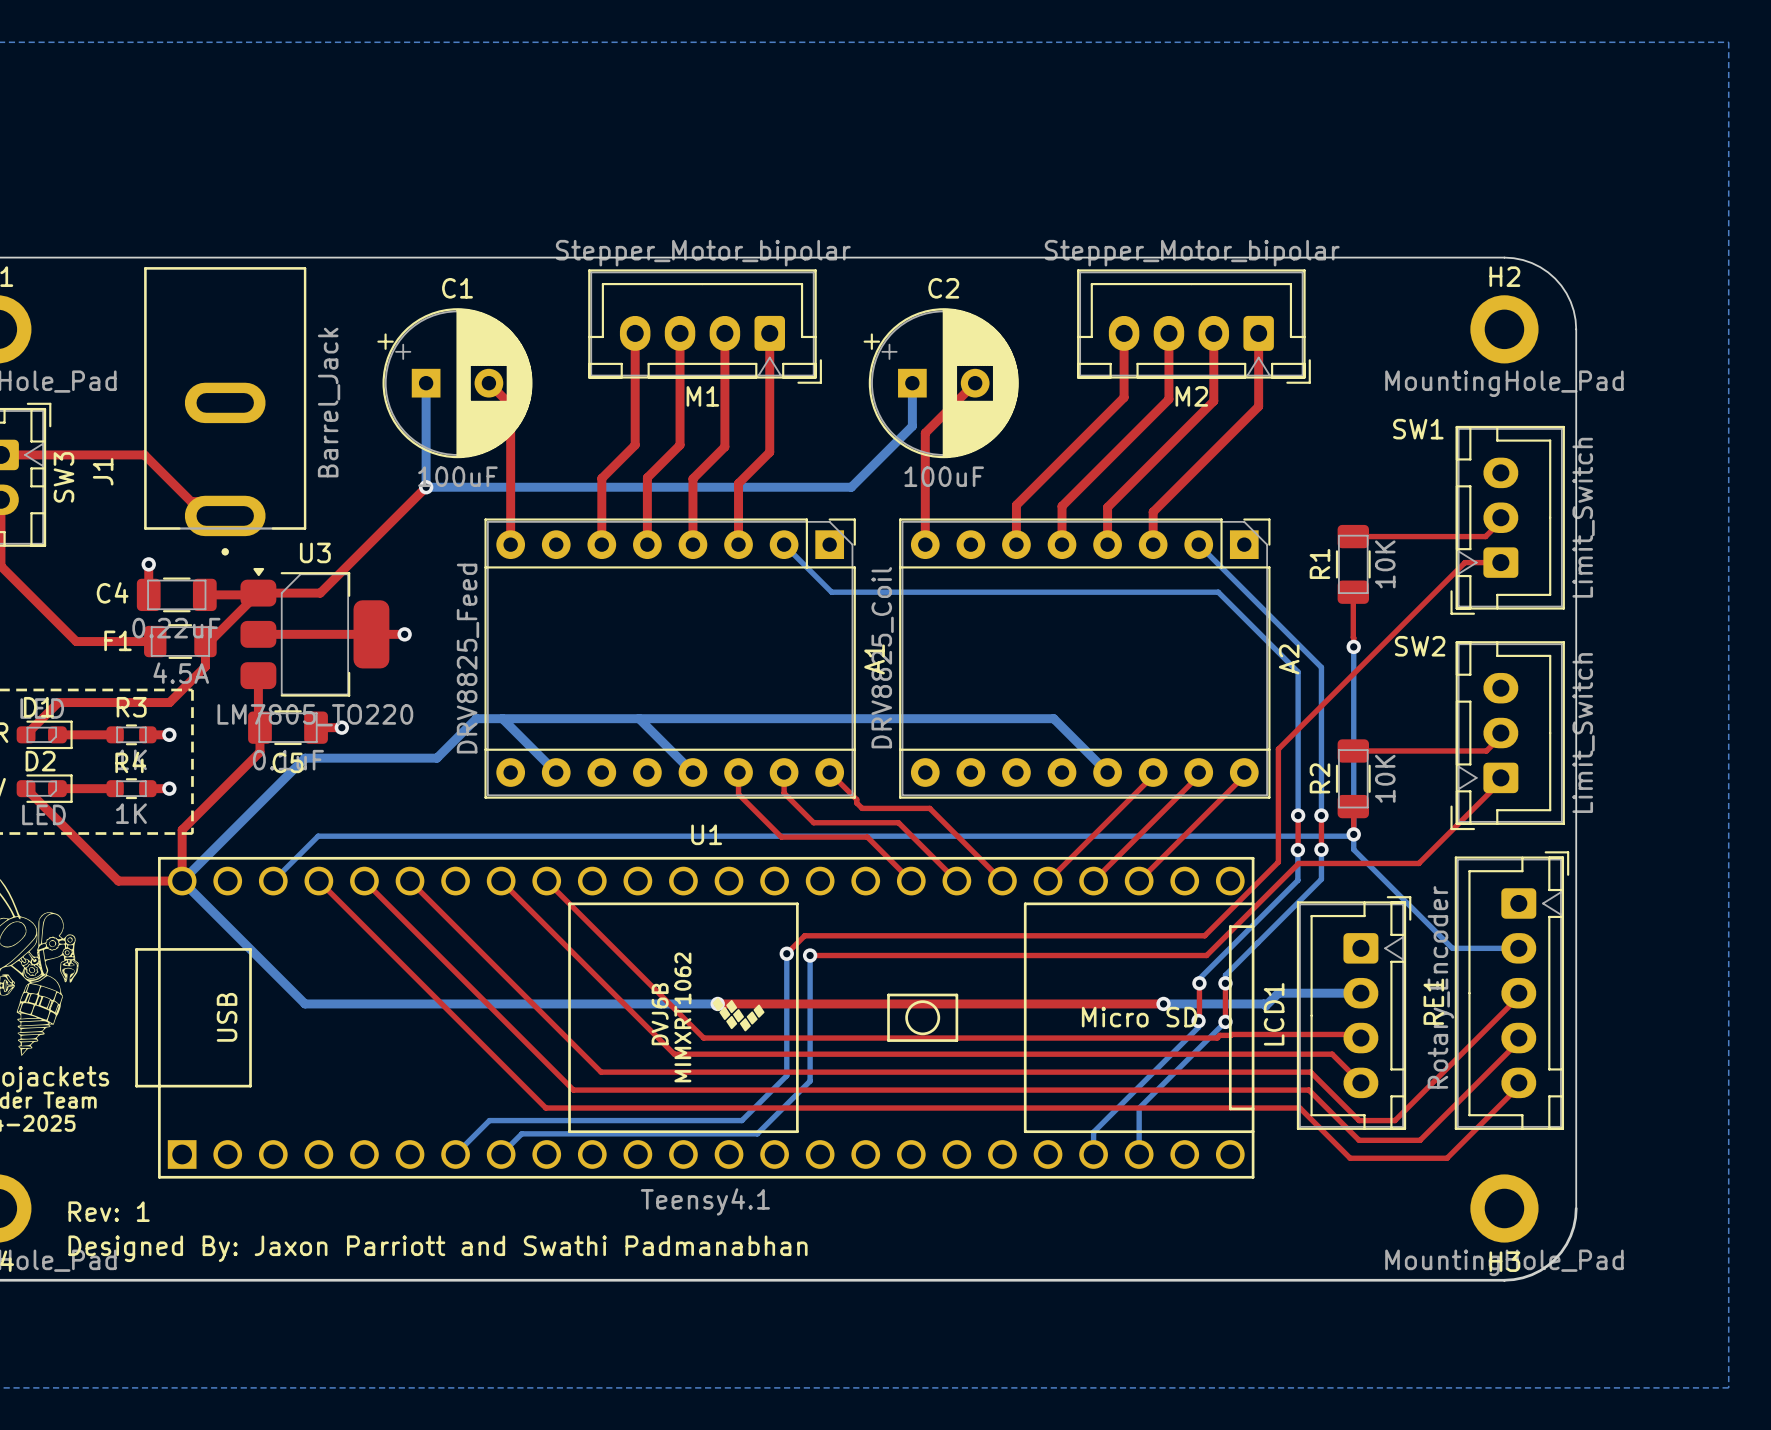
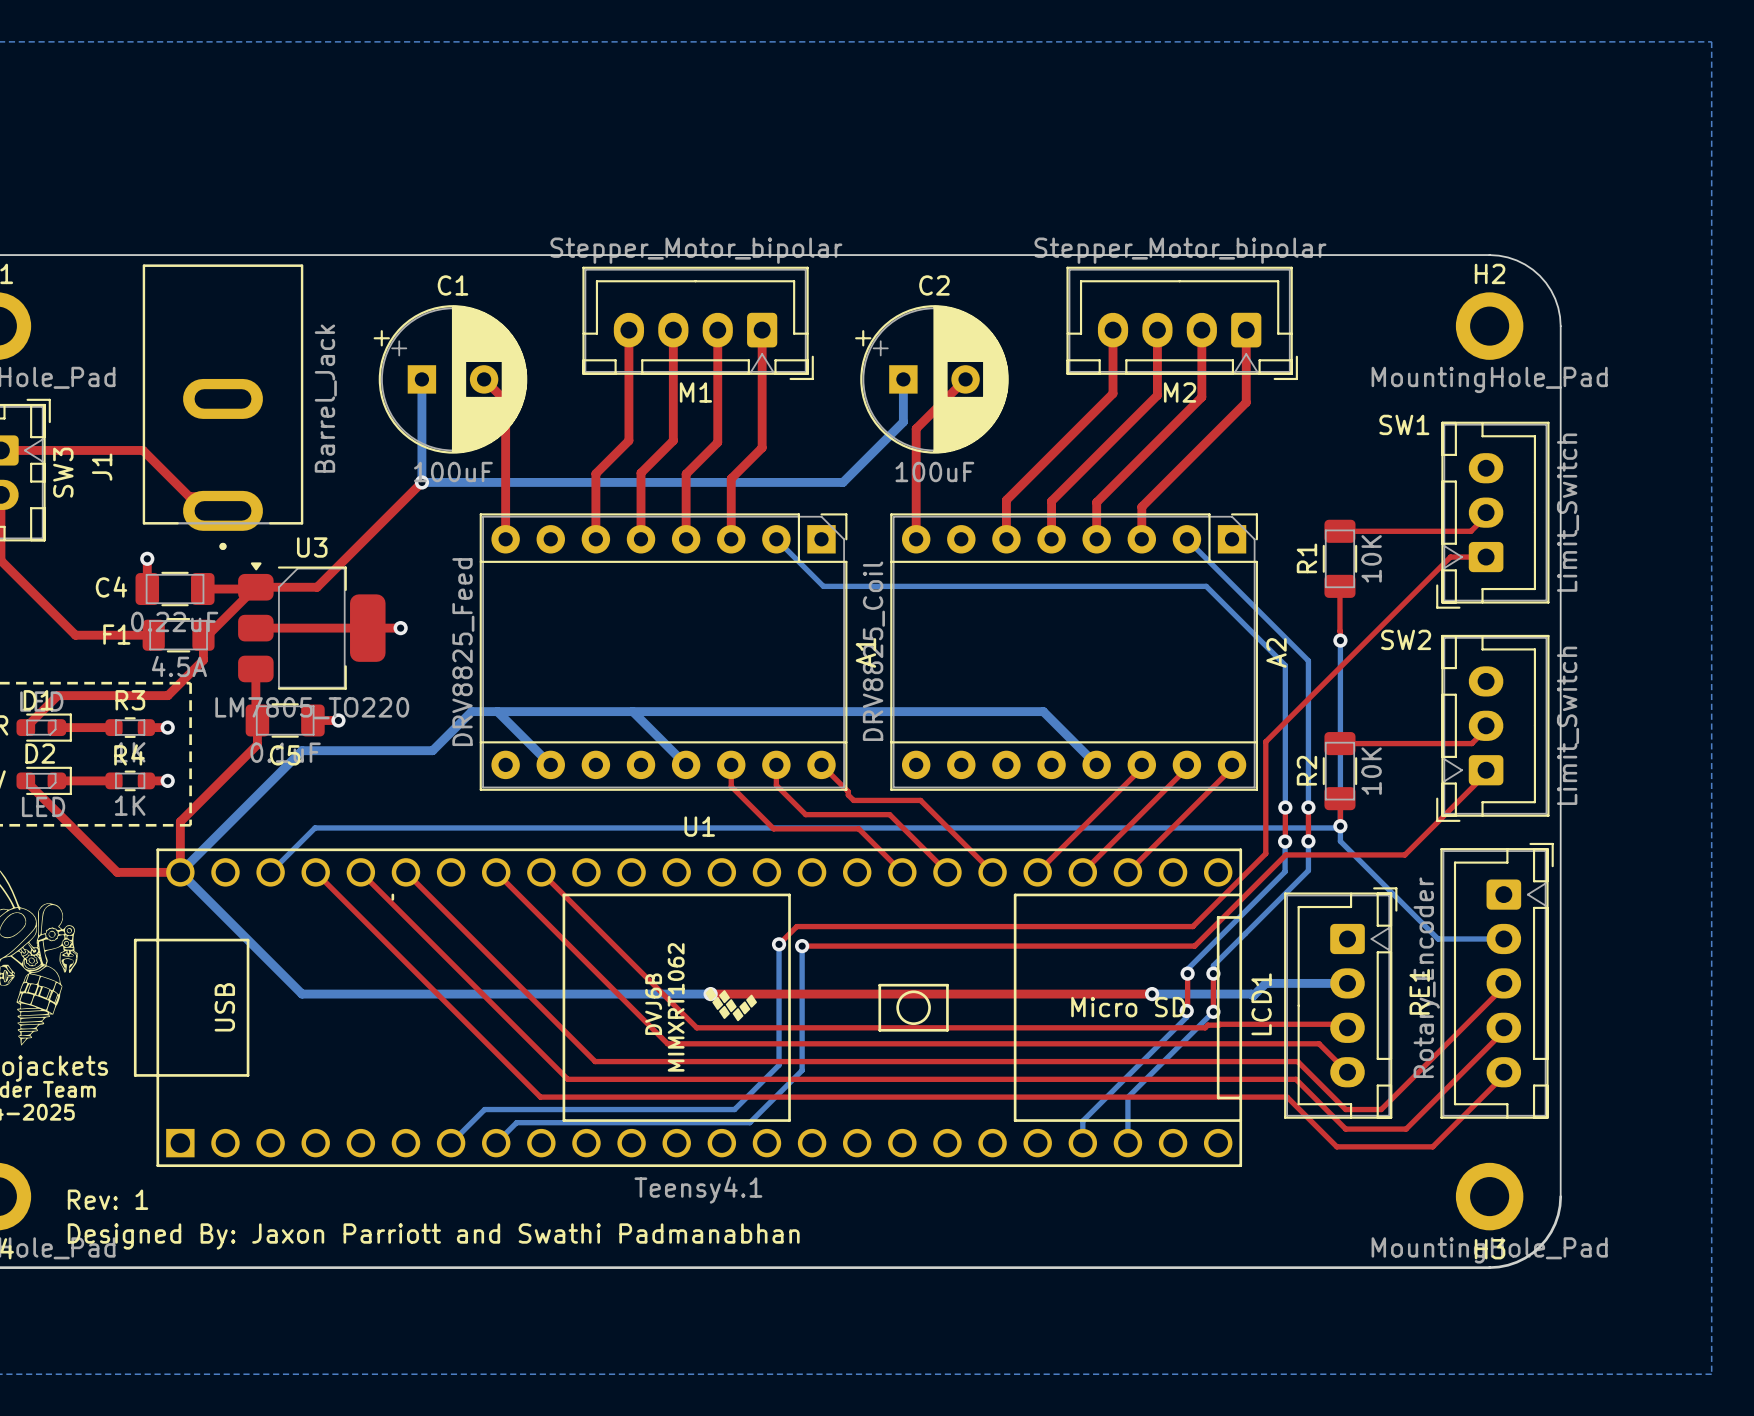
U1 footprint: [135, 856, 1255, 1179] -> [133, 848, 1243, 1168]

